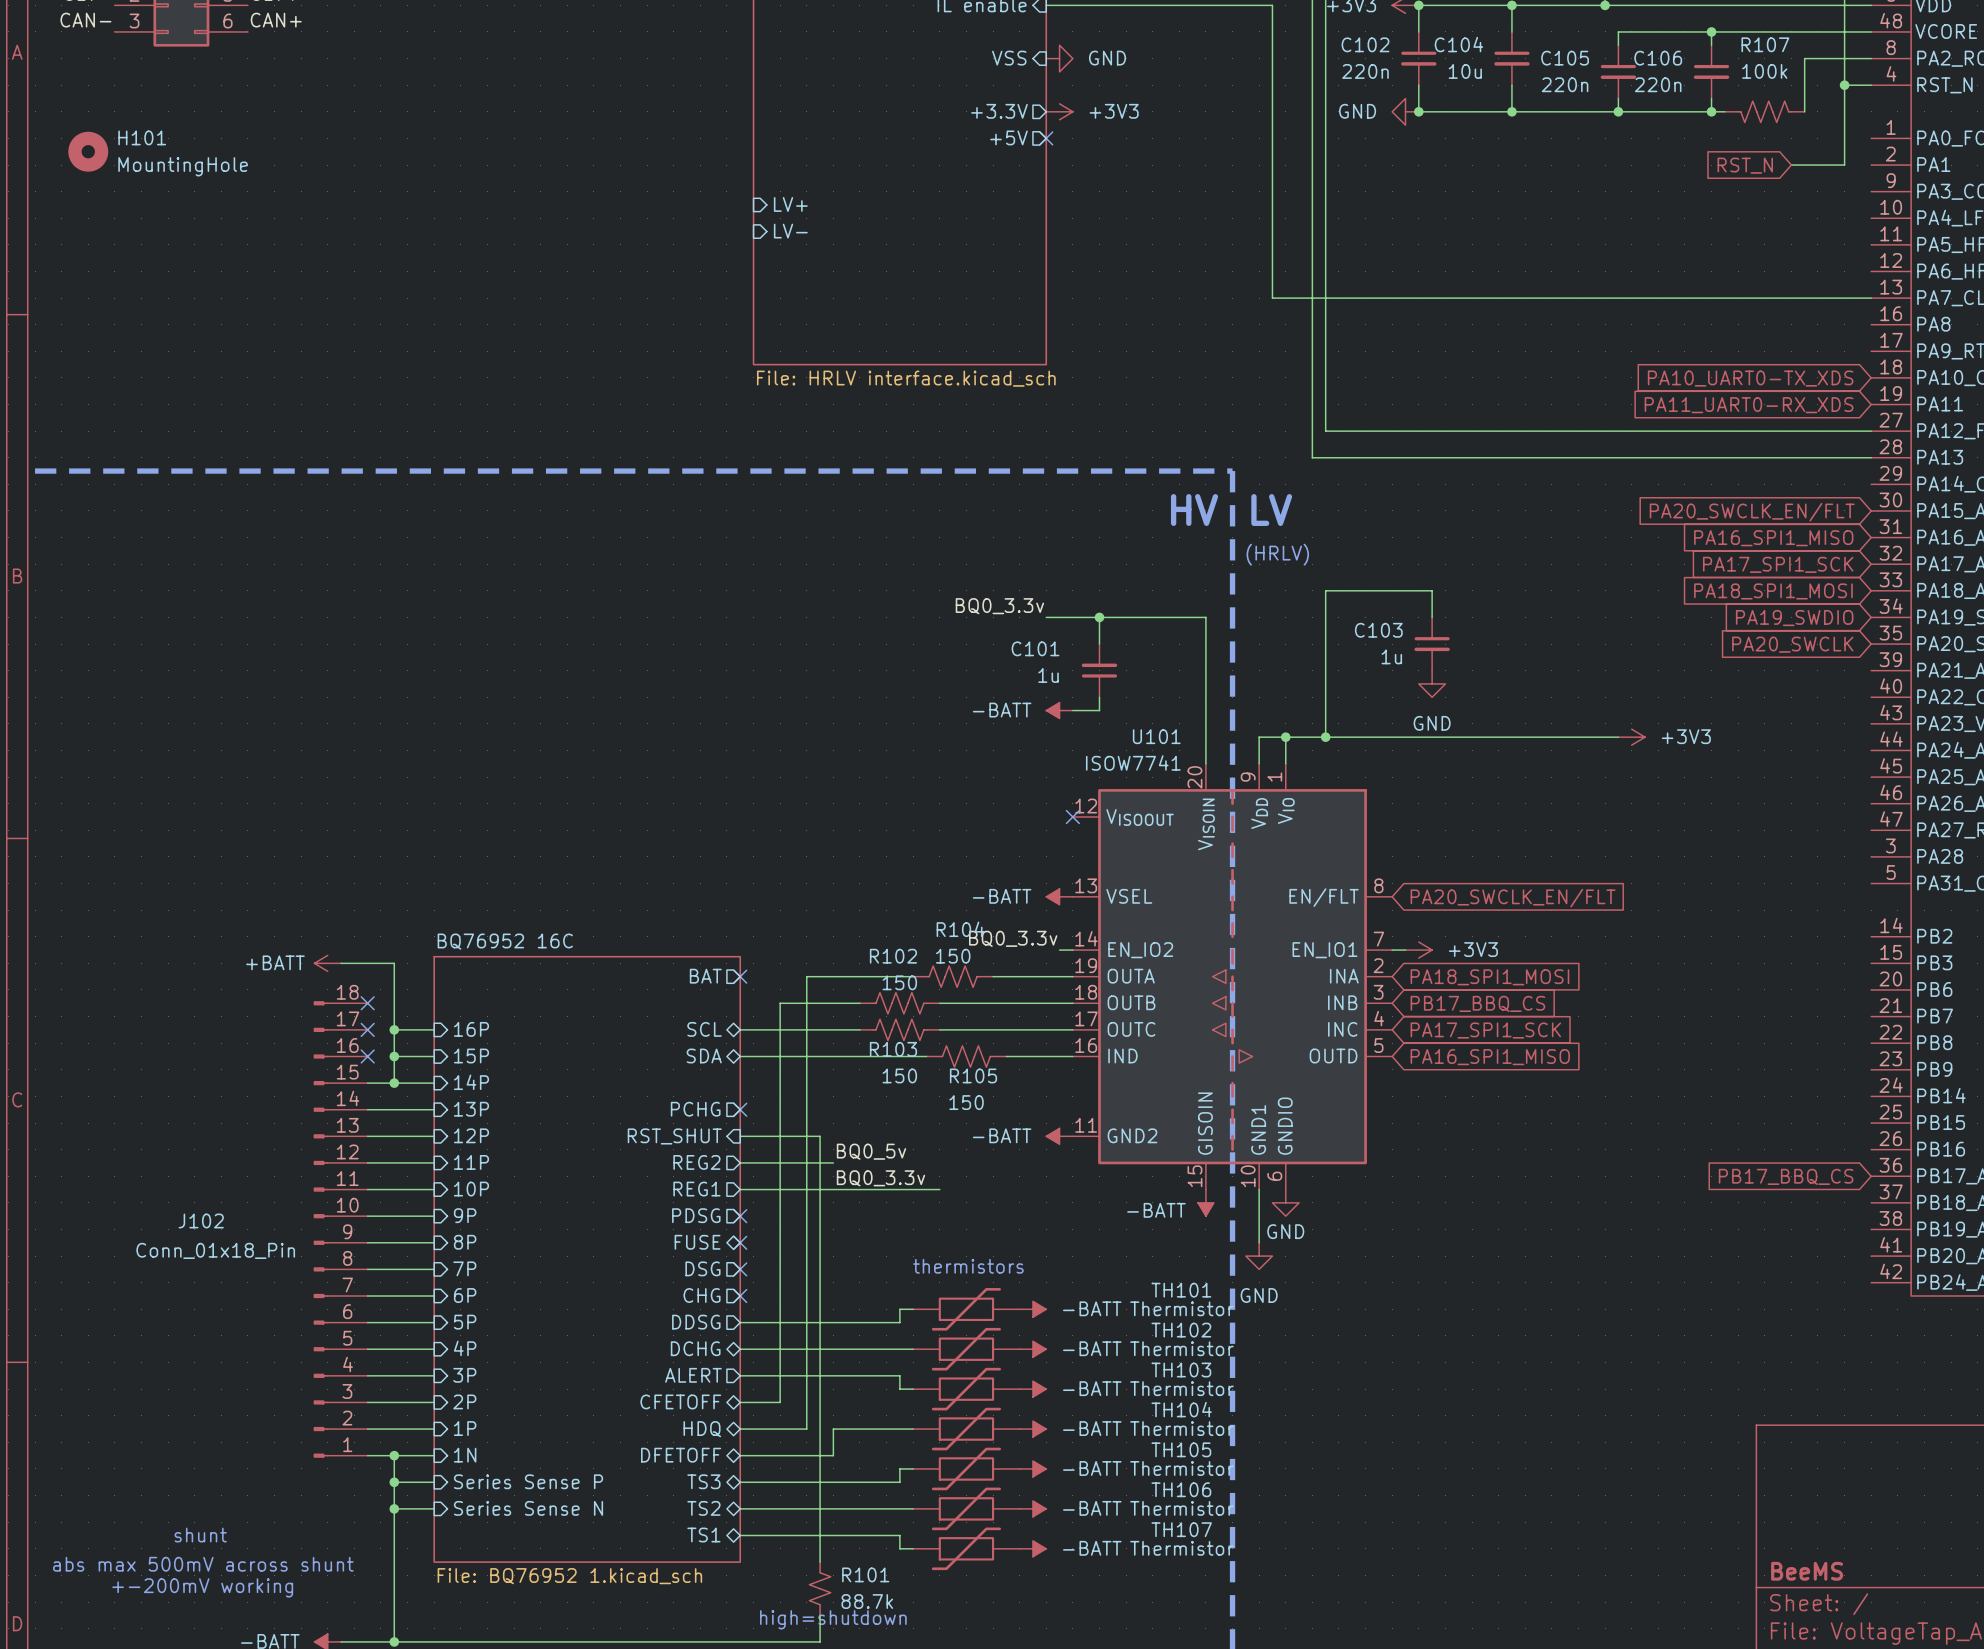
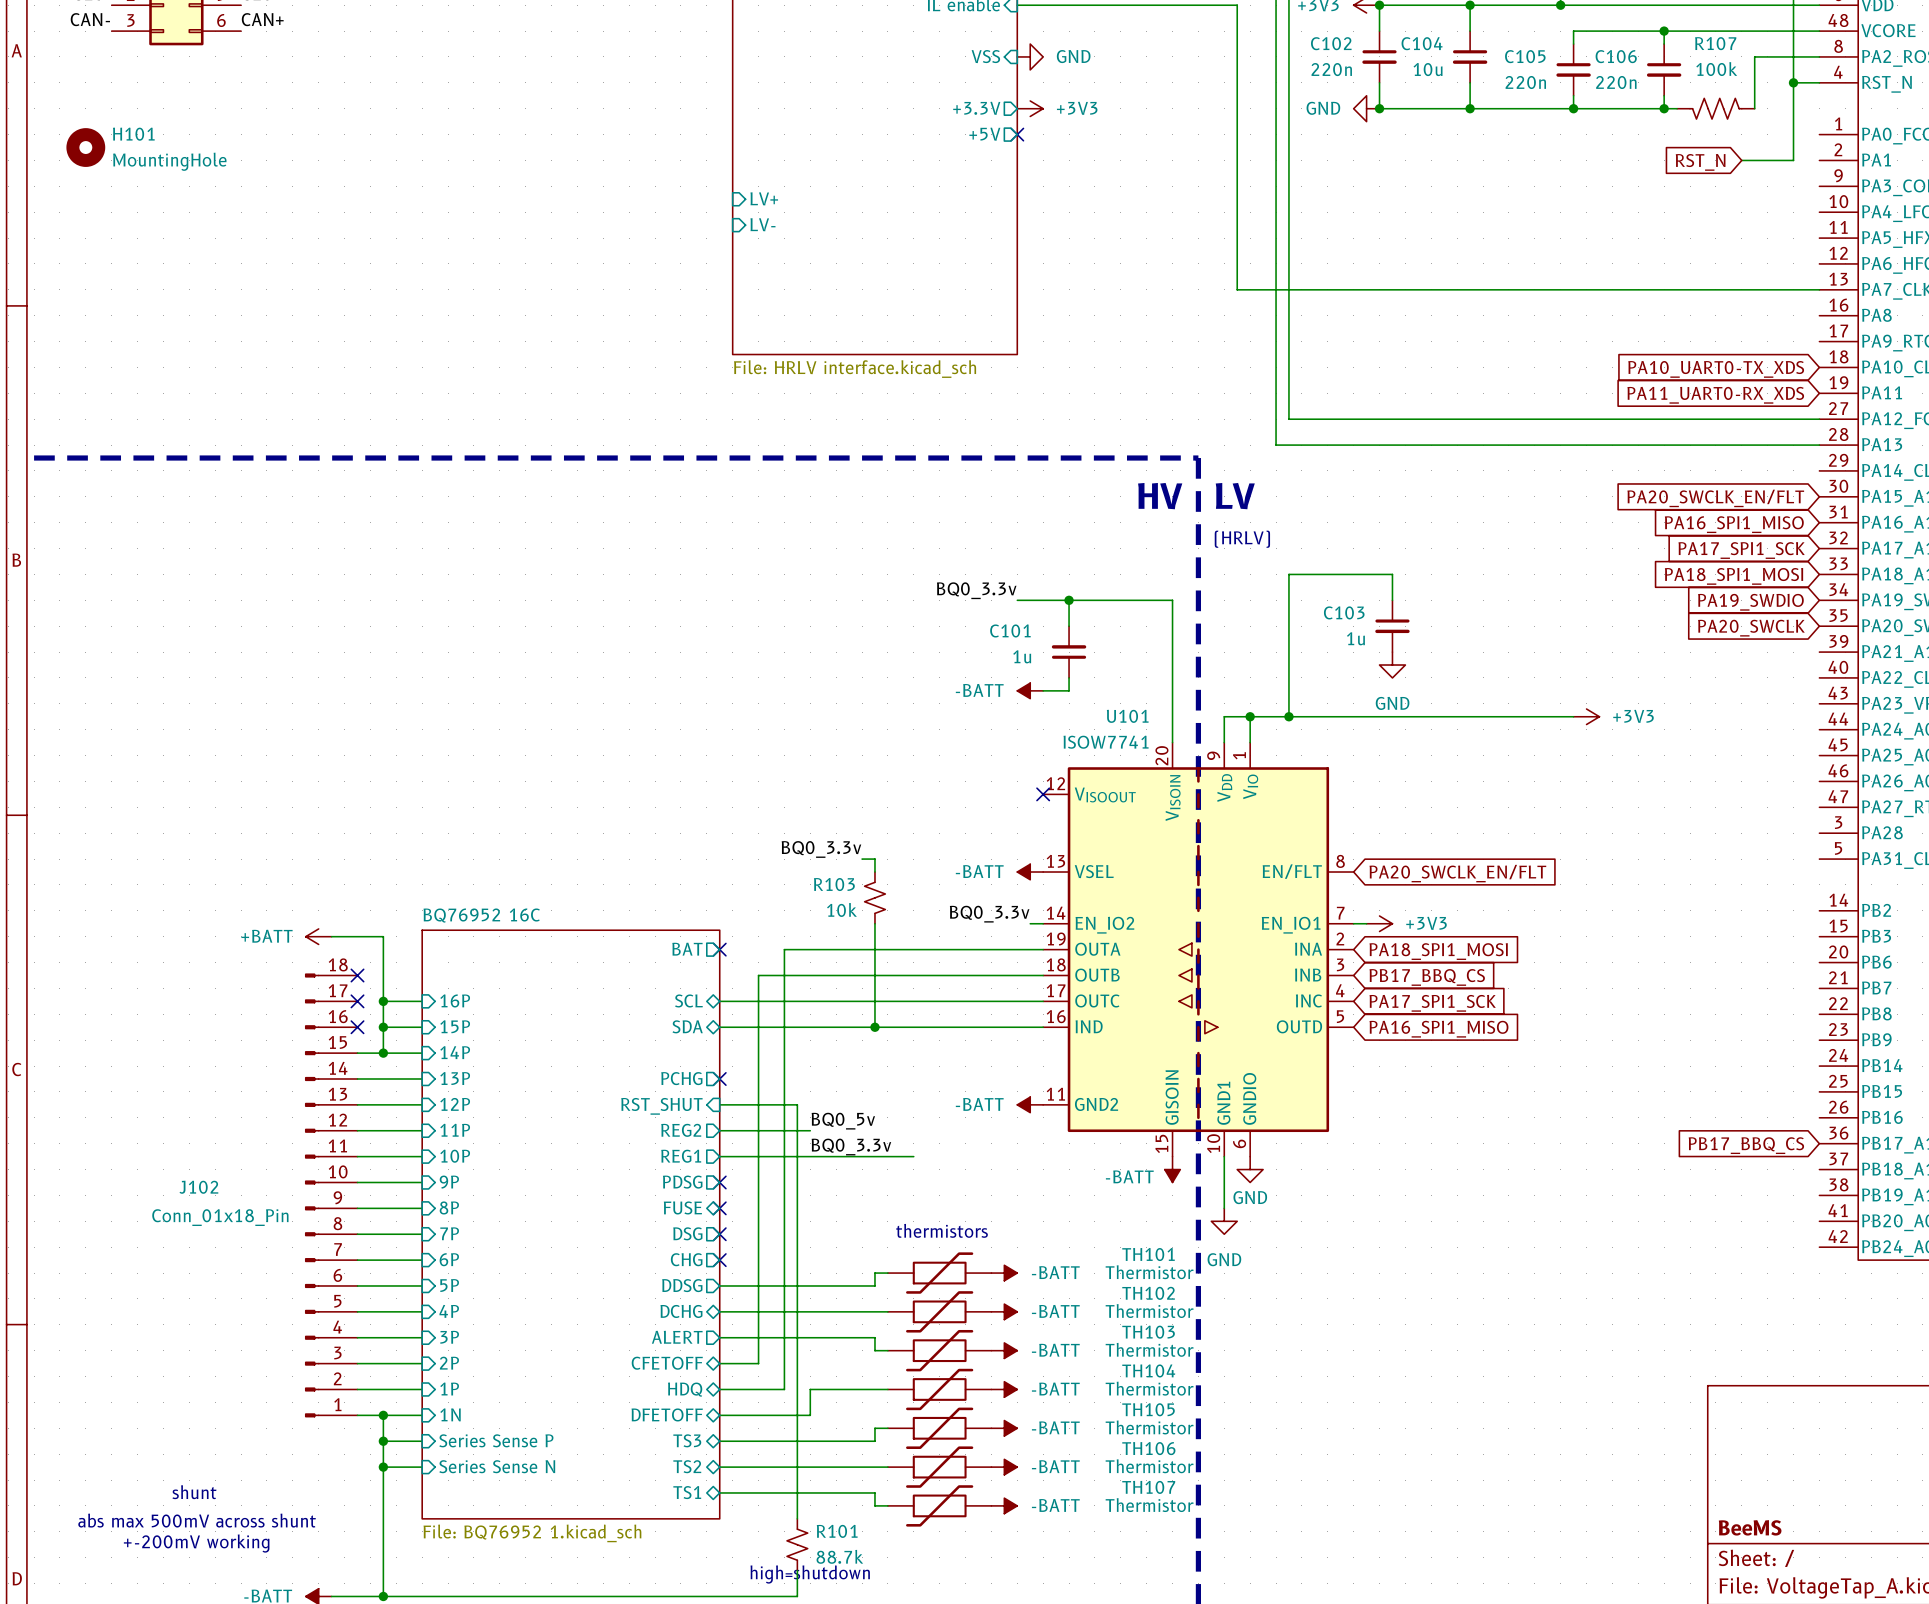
label: none -> BQ0_3.3v (821, 849)
wire: none -> (862, 859) (874, 859) (874, 872)
wire: none -> (874, 923) (874, 1027)
R104: 150 (953, 976) -> none
R102: 150 (899, 1003) -> none
R103 symbol: [859, 1019, 940, 1041] -> [864, 872, 886, 924]
R103 name position: R103 (893, 1049) -> R103 (834, 884)
junction: none -> (874, 1027)
R105: 150 (966, 1056) -> none
R103 value: 150 (899, 1075) -> 10k (841, 909)

